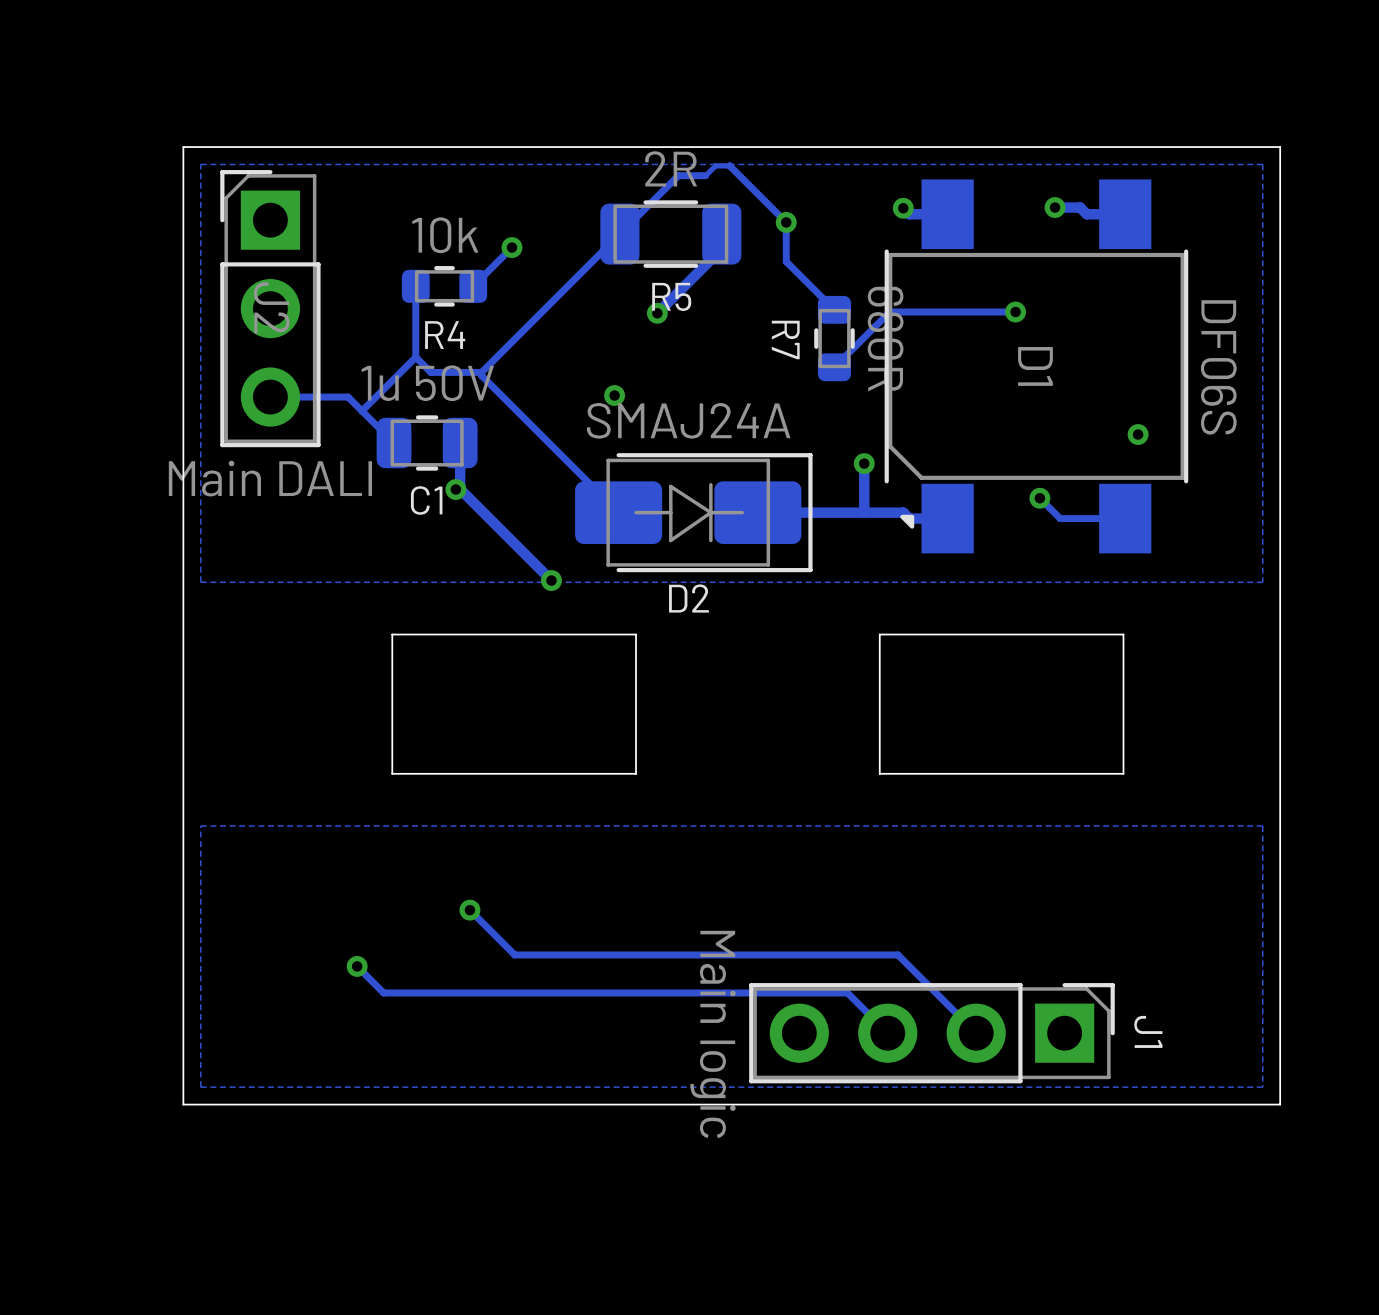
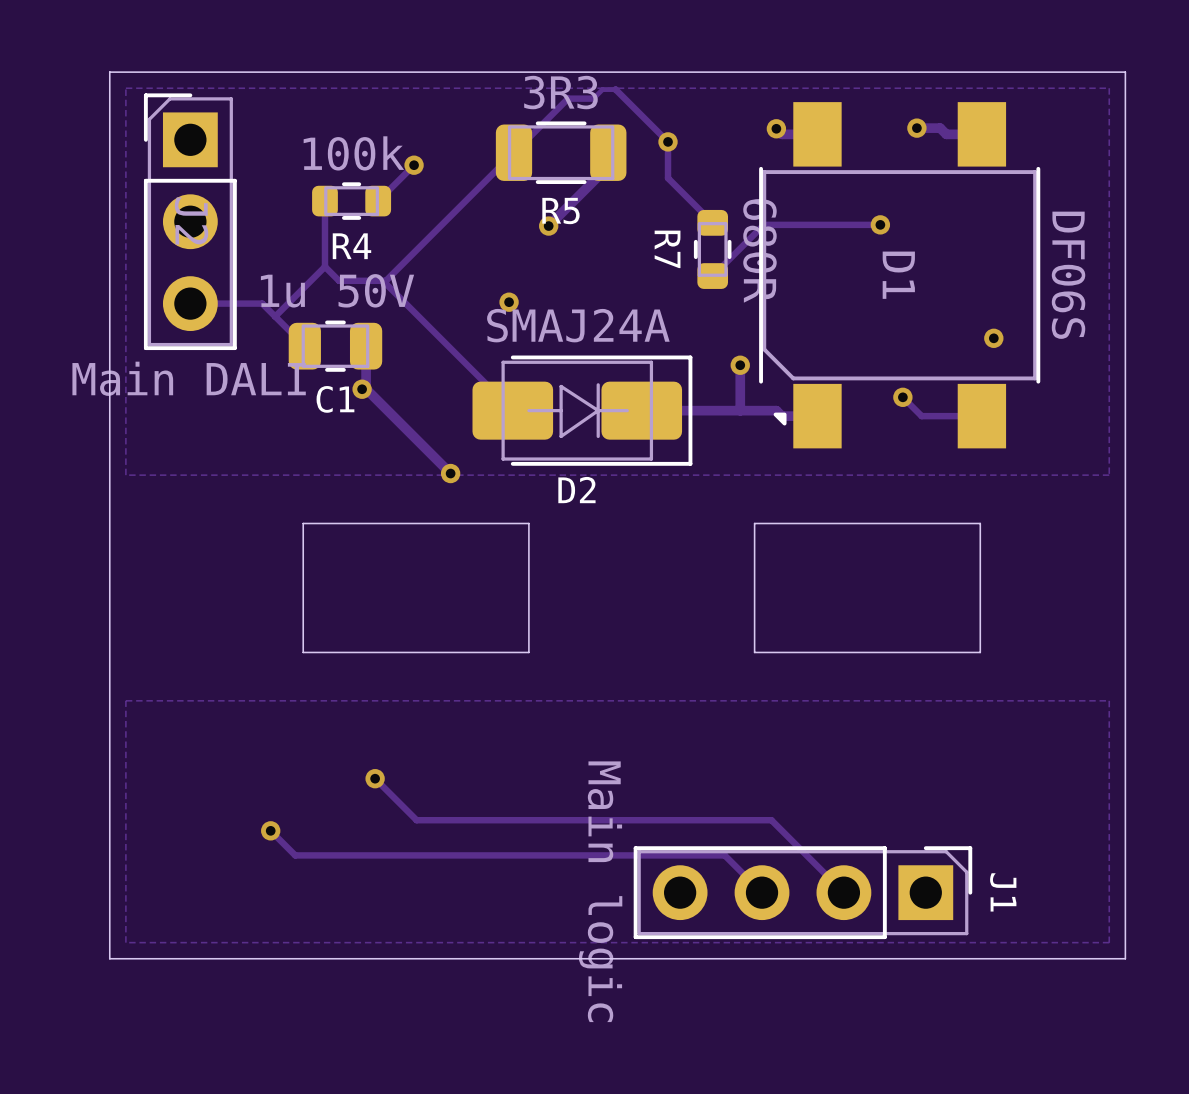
R5 value: 2R (671, 168) -> 3R3 (560, 92)
R4 value: 10k (445, 235) -> 100k (353, 153)

